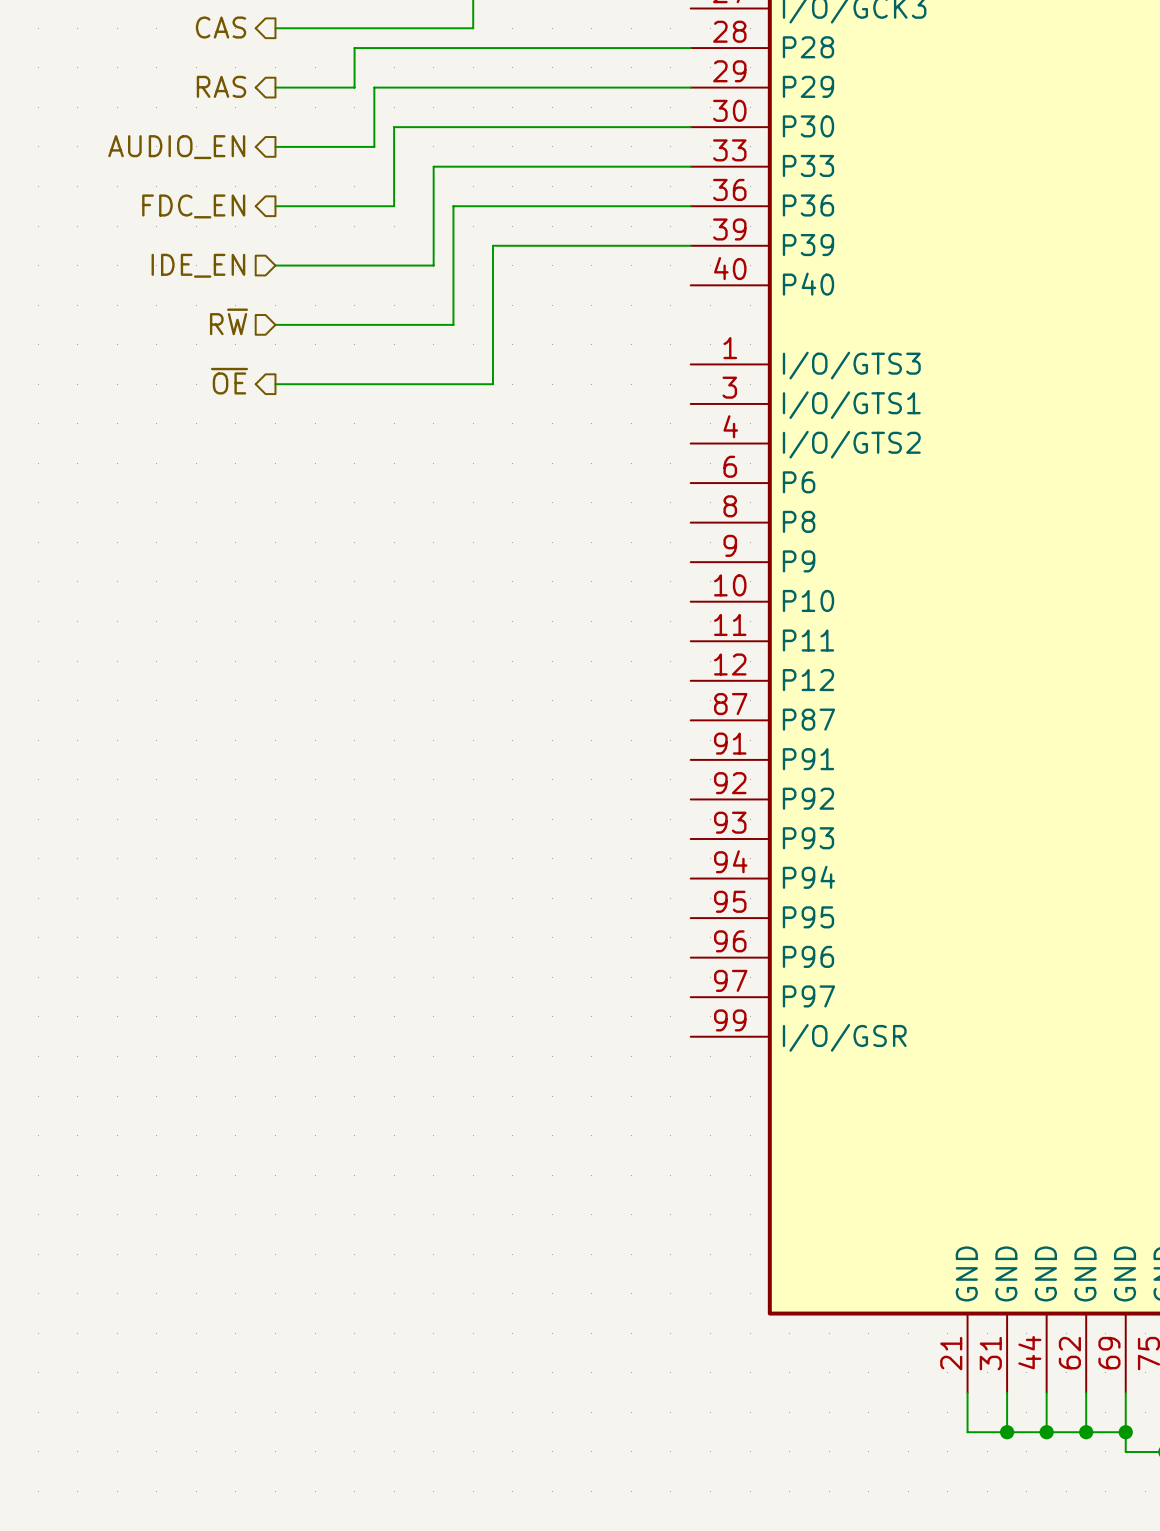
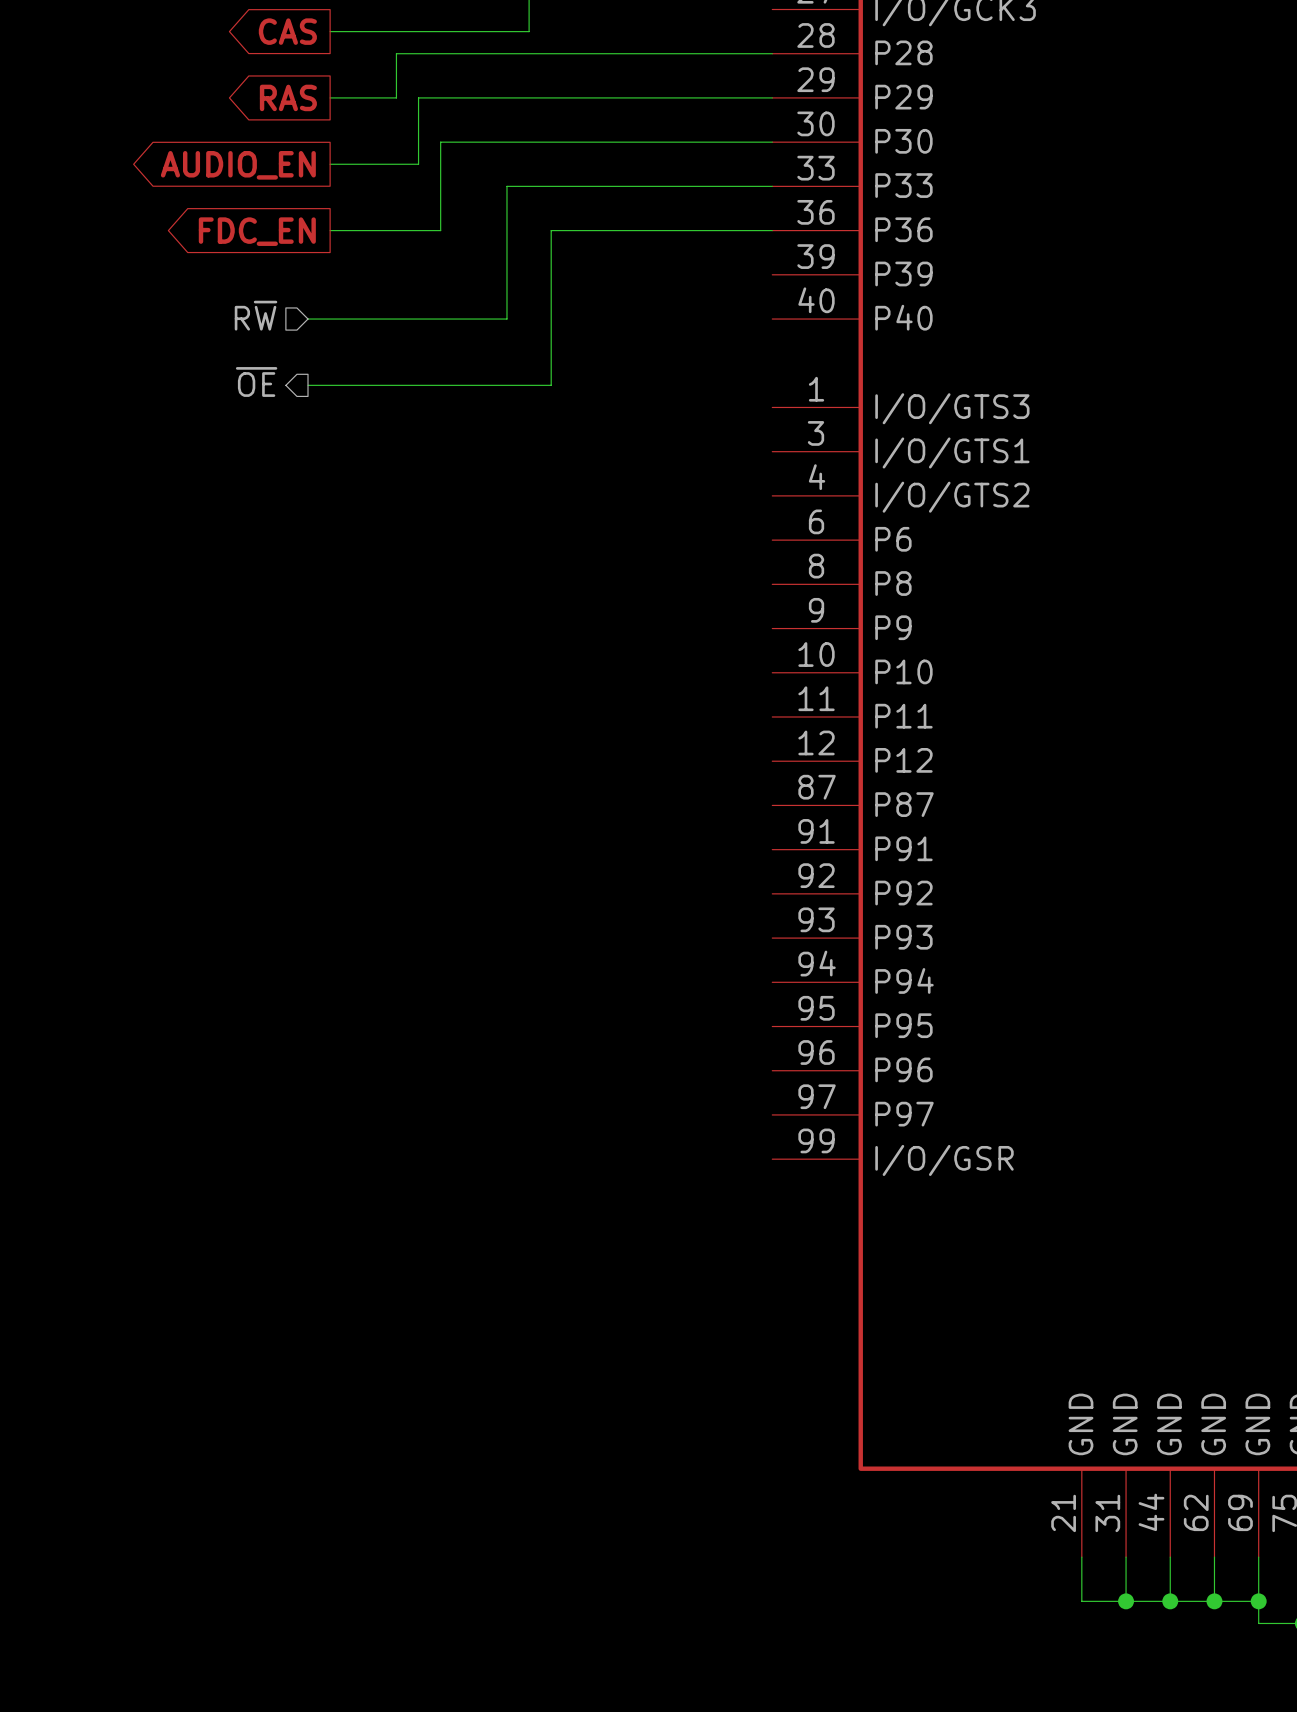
hierarchical label: CAS (221, 27) -> none
global label: none -> CAS (287, 31)
wire: (275, 28) (295, 28) -> none
hierarchical label: RAS (221, 86) -> none
global label: none -> RAS (288, 97)
wire: (275, 87) (295, 87) -> none
wire: (275, 146) (295, 146) -> none
hierarchical label: AUDIO_EN (176, 147) -> none
global label: none -> AUDIO_EN (238, 165)
wire: (453, 166) (433, 166) (433, 265) (275, 265) -> (506, 186) (506, 230)
hierarchical label: FDC_EN (193, 206) -> none
wire: (275, 206) (295, 206) -> none
wire: (453, 206) (492, 206) -> (551, 274) (551, 230)
global label: none -> FDC_EN (257, 231)
wire: (492, 245) (690, 245) -> none
hierarchical label: IDE_EN (198, 265) -> none
wire: (453, 285) (453, 324) (275, 324) -> (506, 319) (308, 319)
hierarchical label position: R~{W} (228, 321) -> R~{W} (256, 315)
wire: (492, 344) (492, 384) (275, 384) -> (551, 385) (308, 385)
hierarchical label position: ~{OE} (229, 381) -> ~{OE} (256, 381)

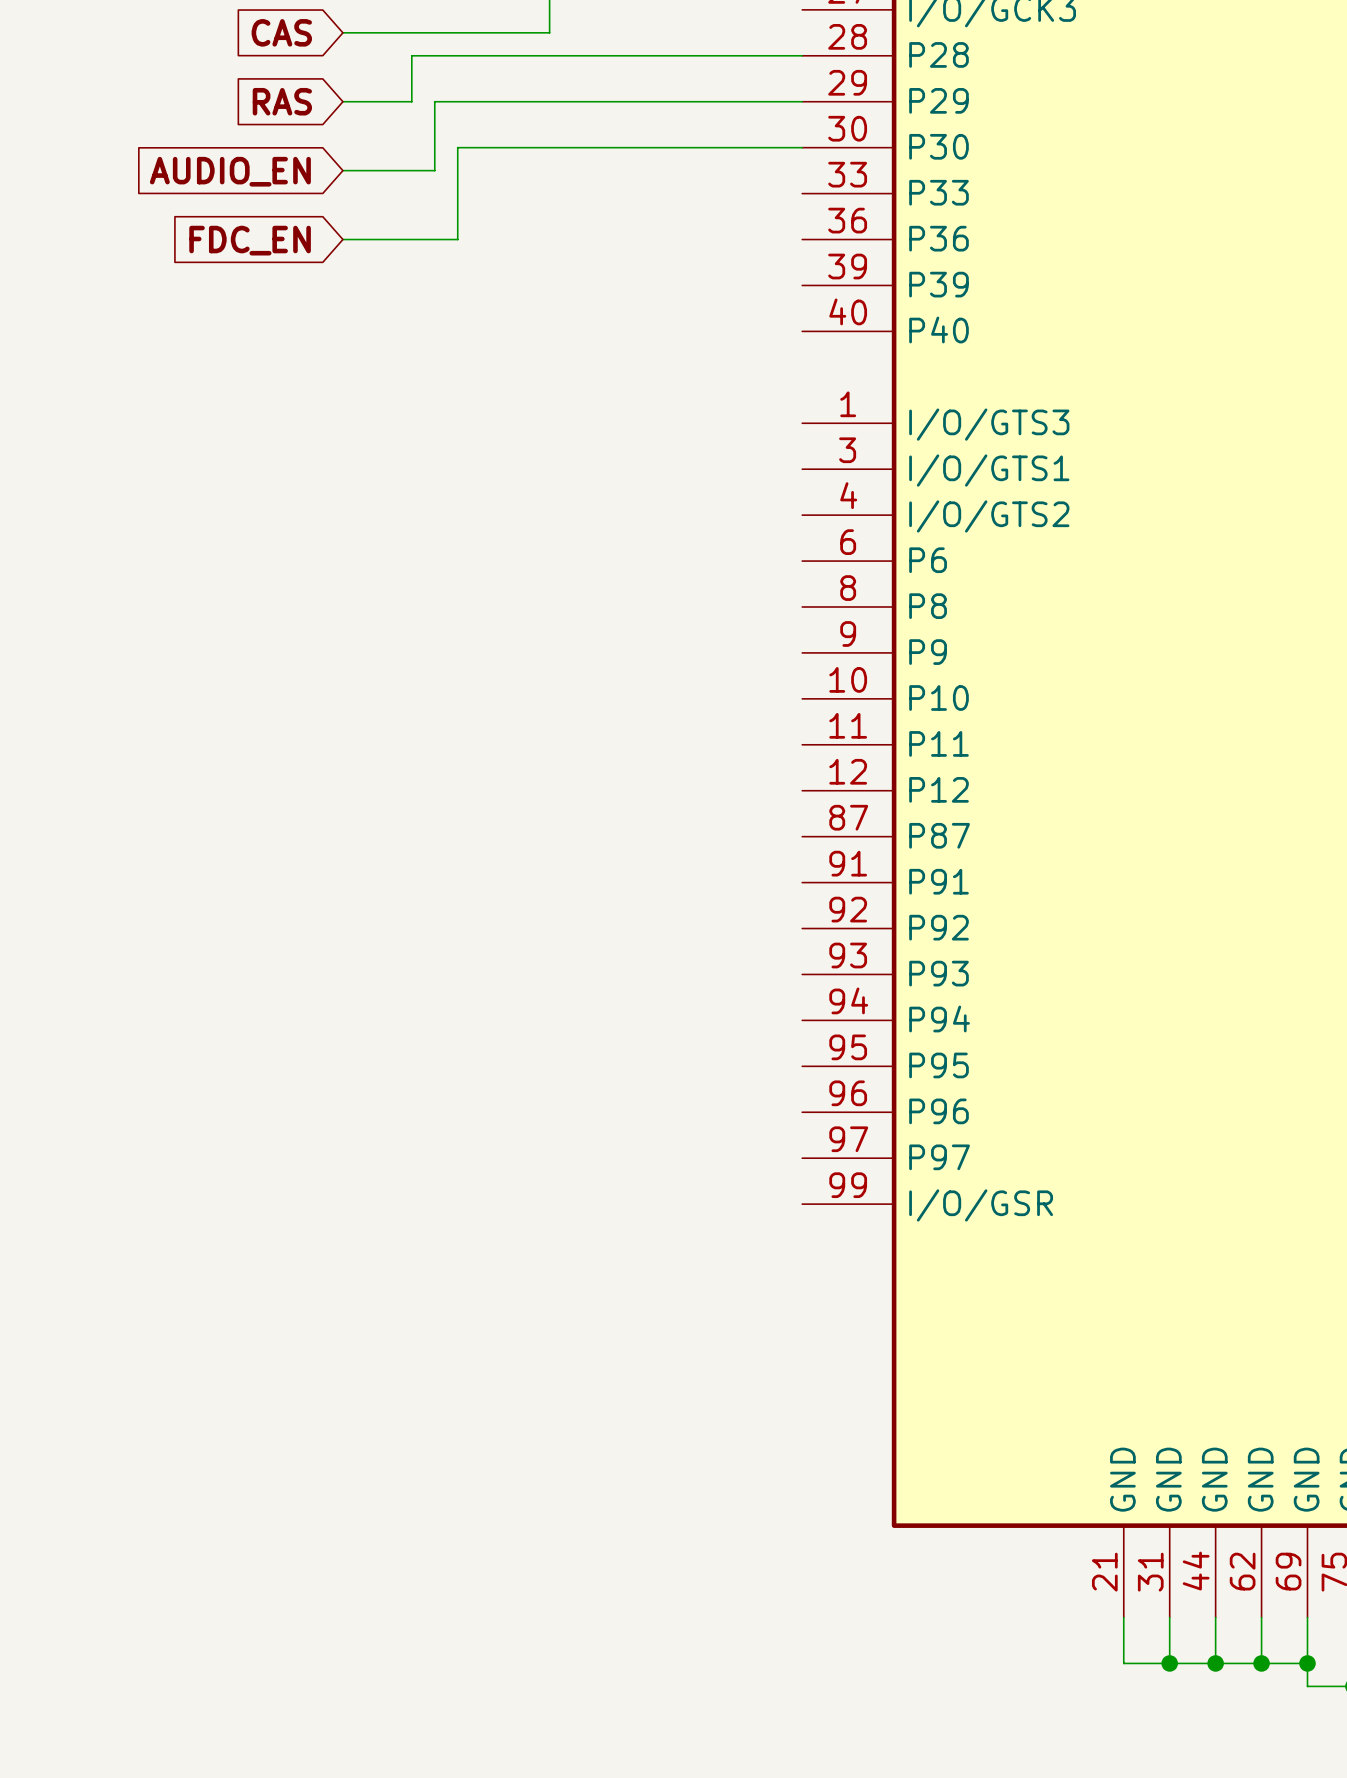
global label shape: output (287, 31) -> input (281, 32)
global label shape: output (288, 97) -> input (282, 101)
global label shape: output (238, 165) -> input (230, 171)
wire: (772, 186) (506, 186) (506, 319) (308, 319) -> none
wire: (772, 230) (551, 230) (551, 385) (308, 385) -> none
global label shape: output (257, 231) -> input (250, 240)
hierarchical label: R~{W} (256, 315) -> none
hierarchical label: ~{OE} (256, 381) -> none

